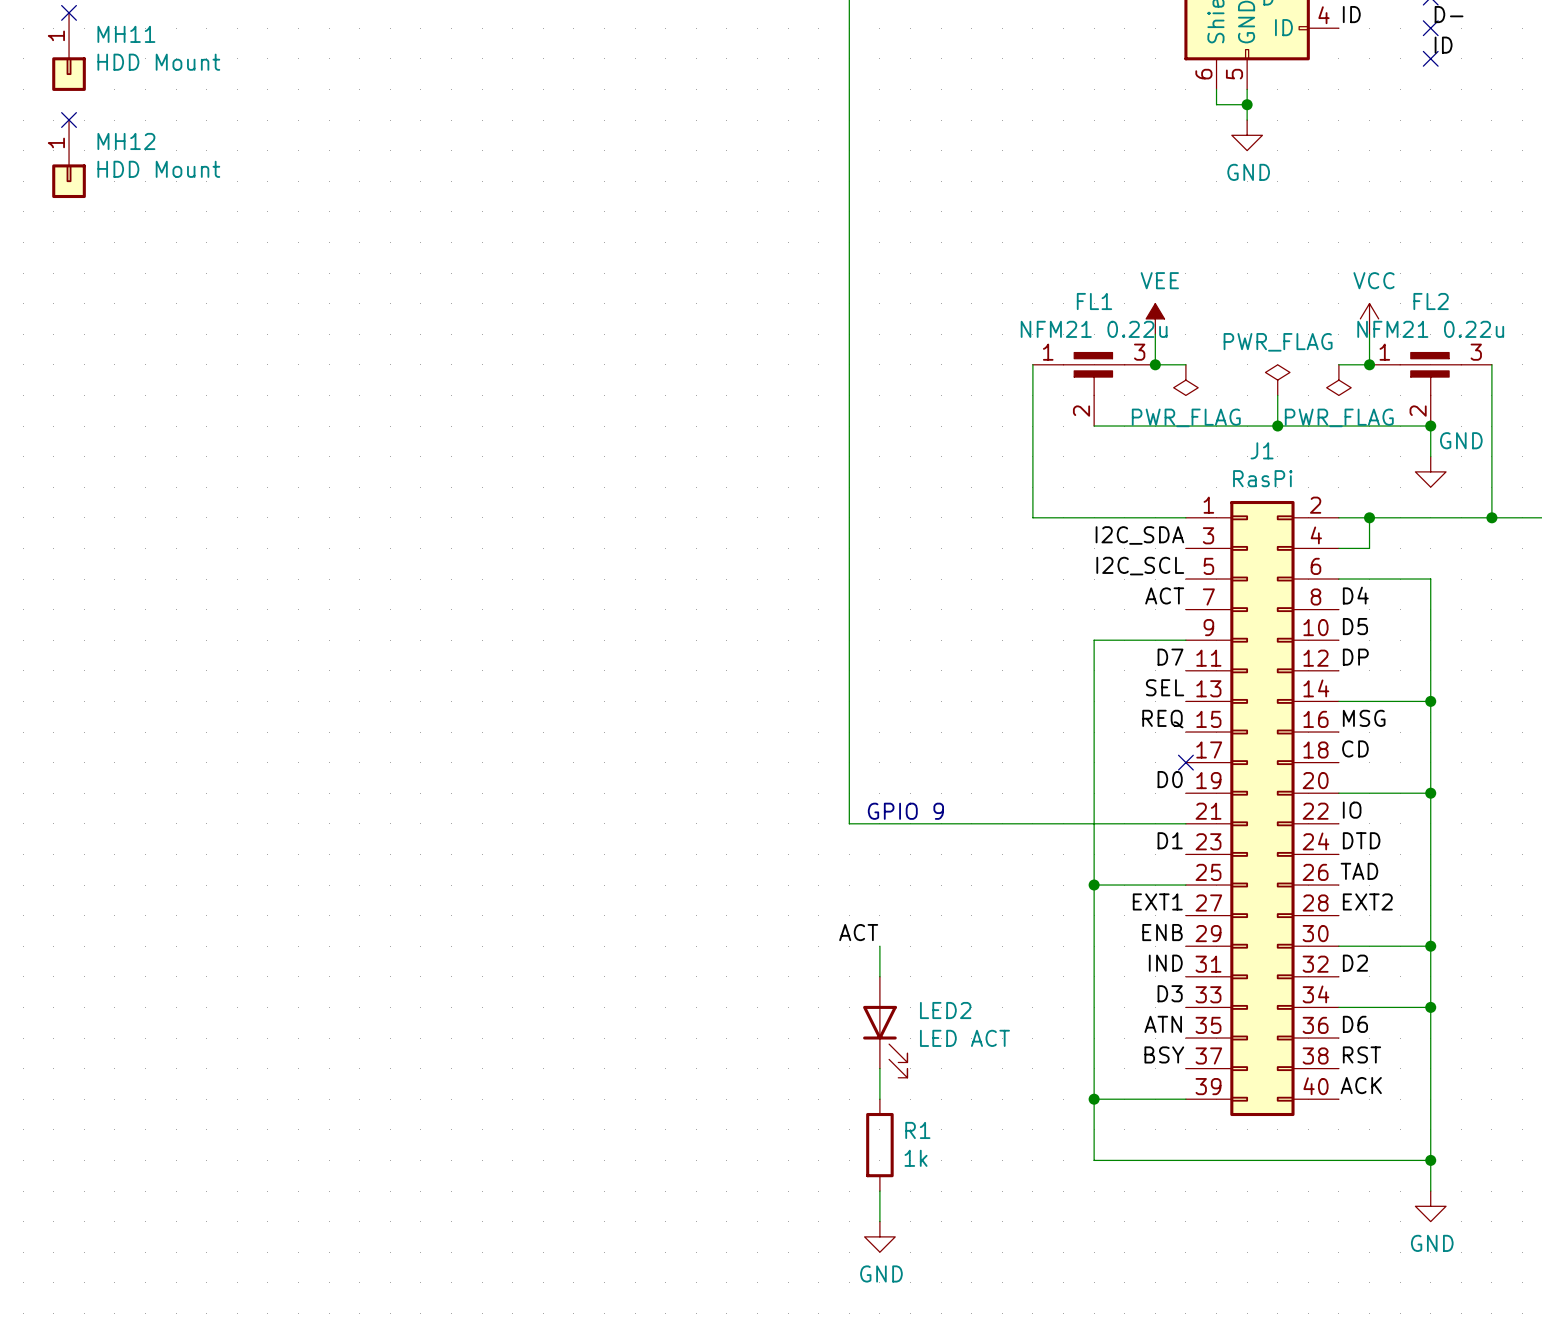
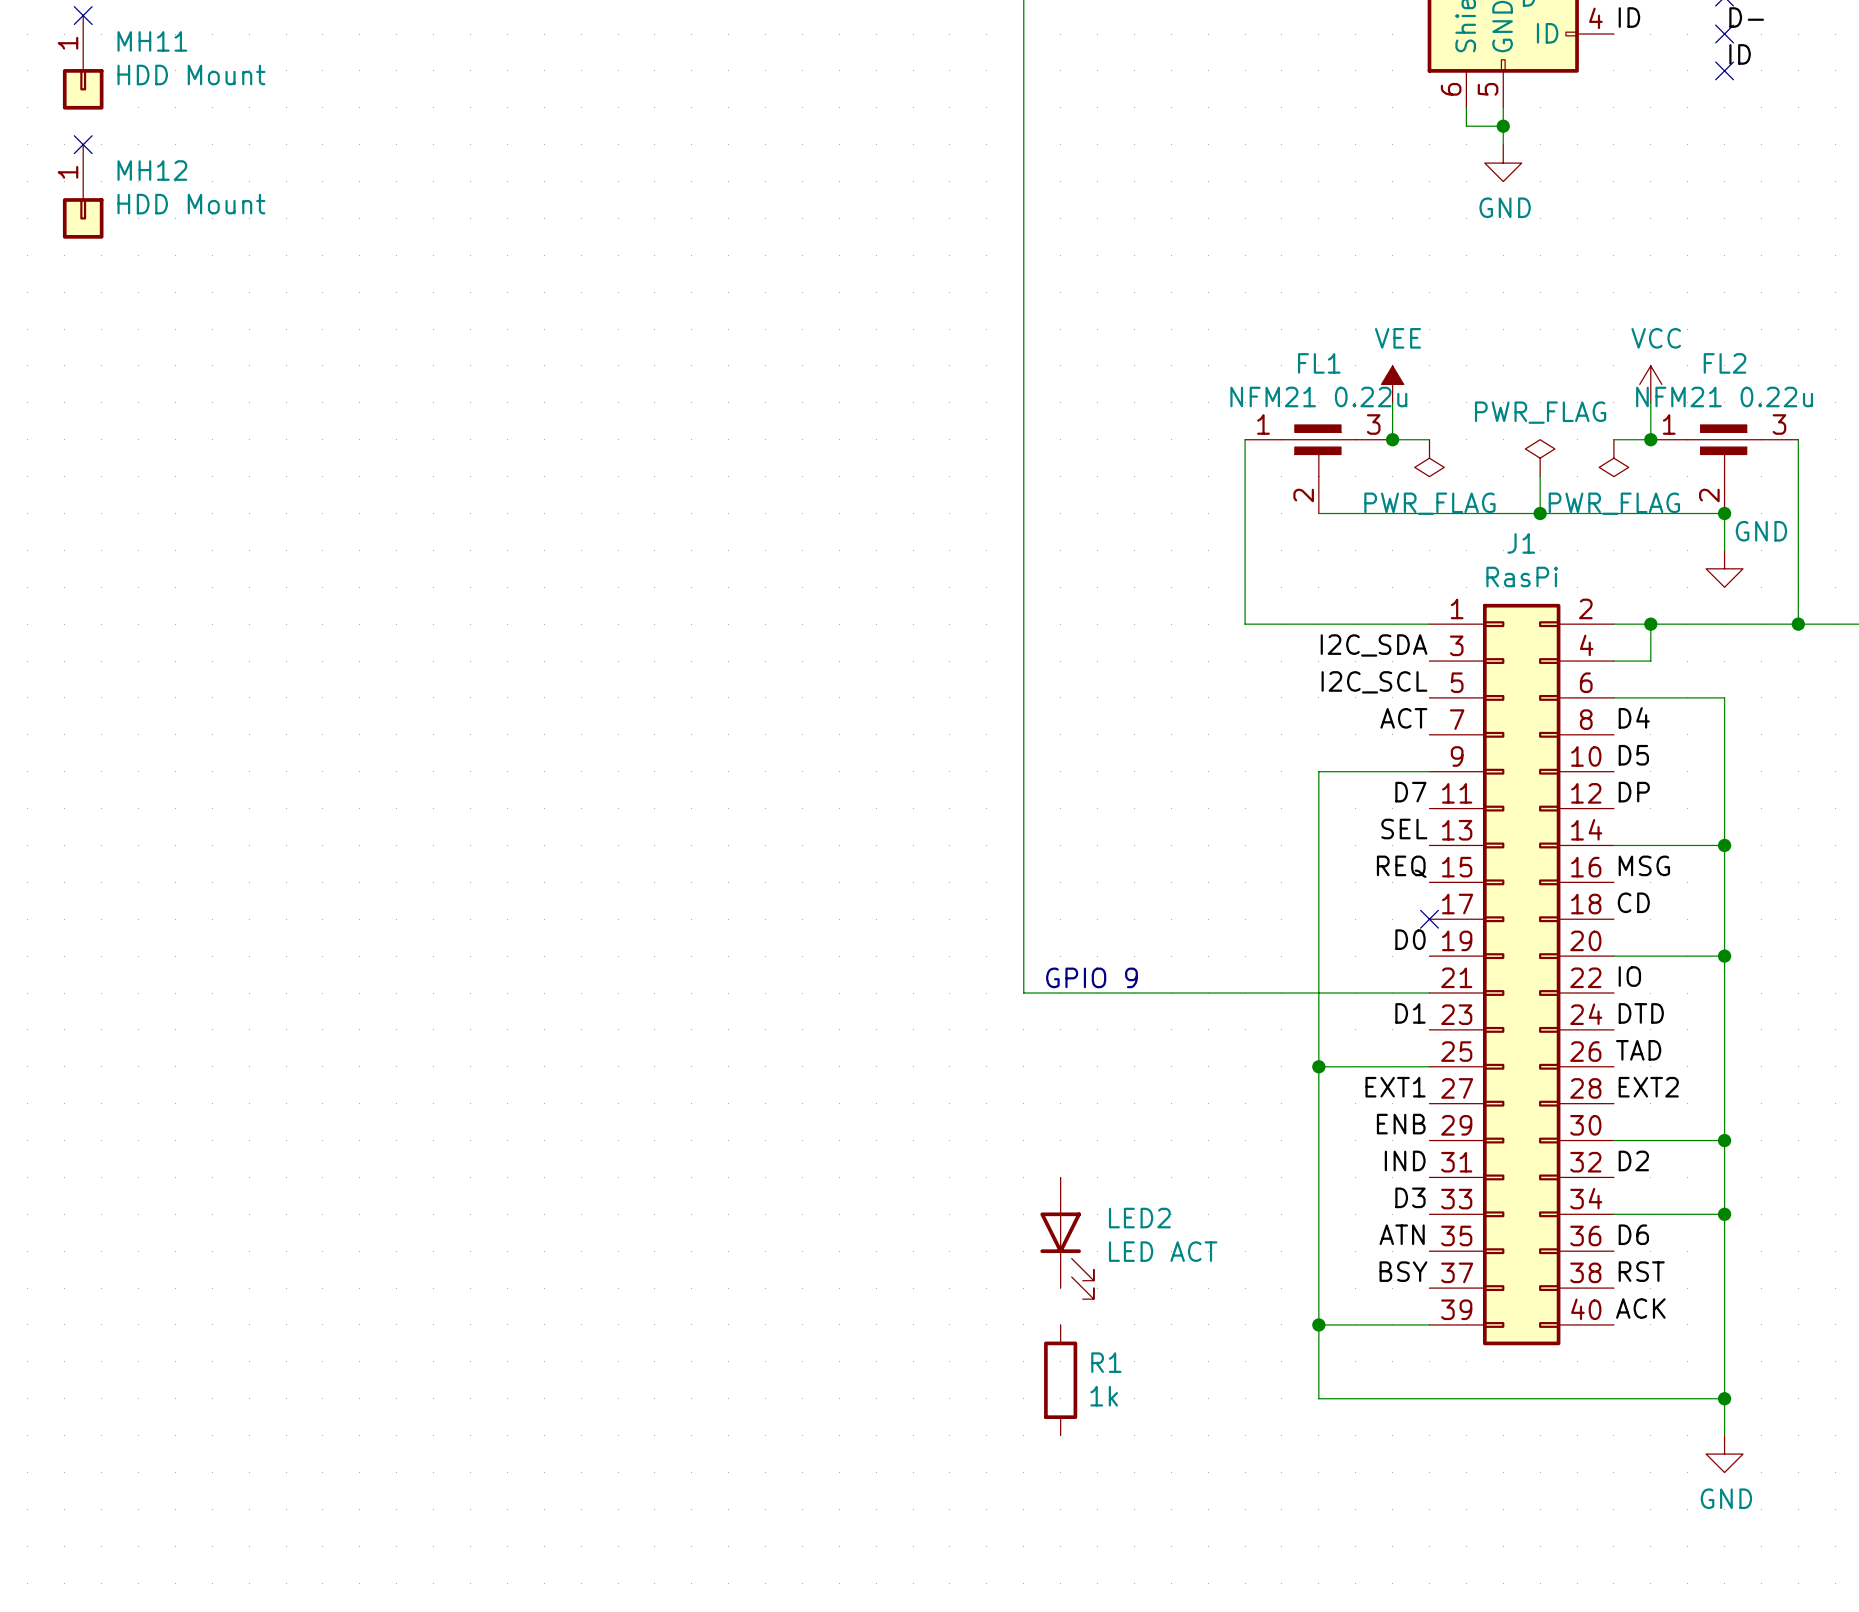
label: ACT (858, 932) -> none
wire: (879, 946) (879, 976) -> none
wire: (879, 1068) (879, 1099) -> none
wire: (879, 1191) (879, 1221) -> none
power symbol: GND (879, 1236) -> none

